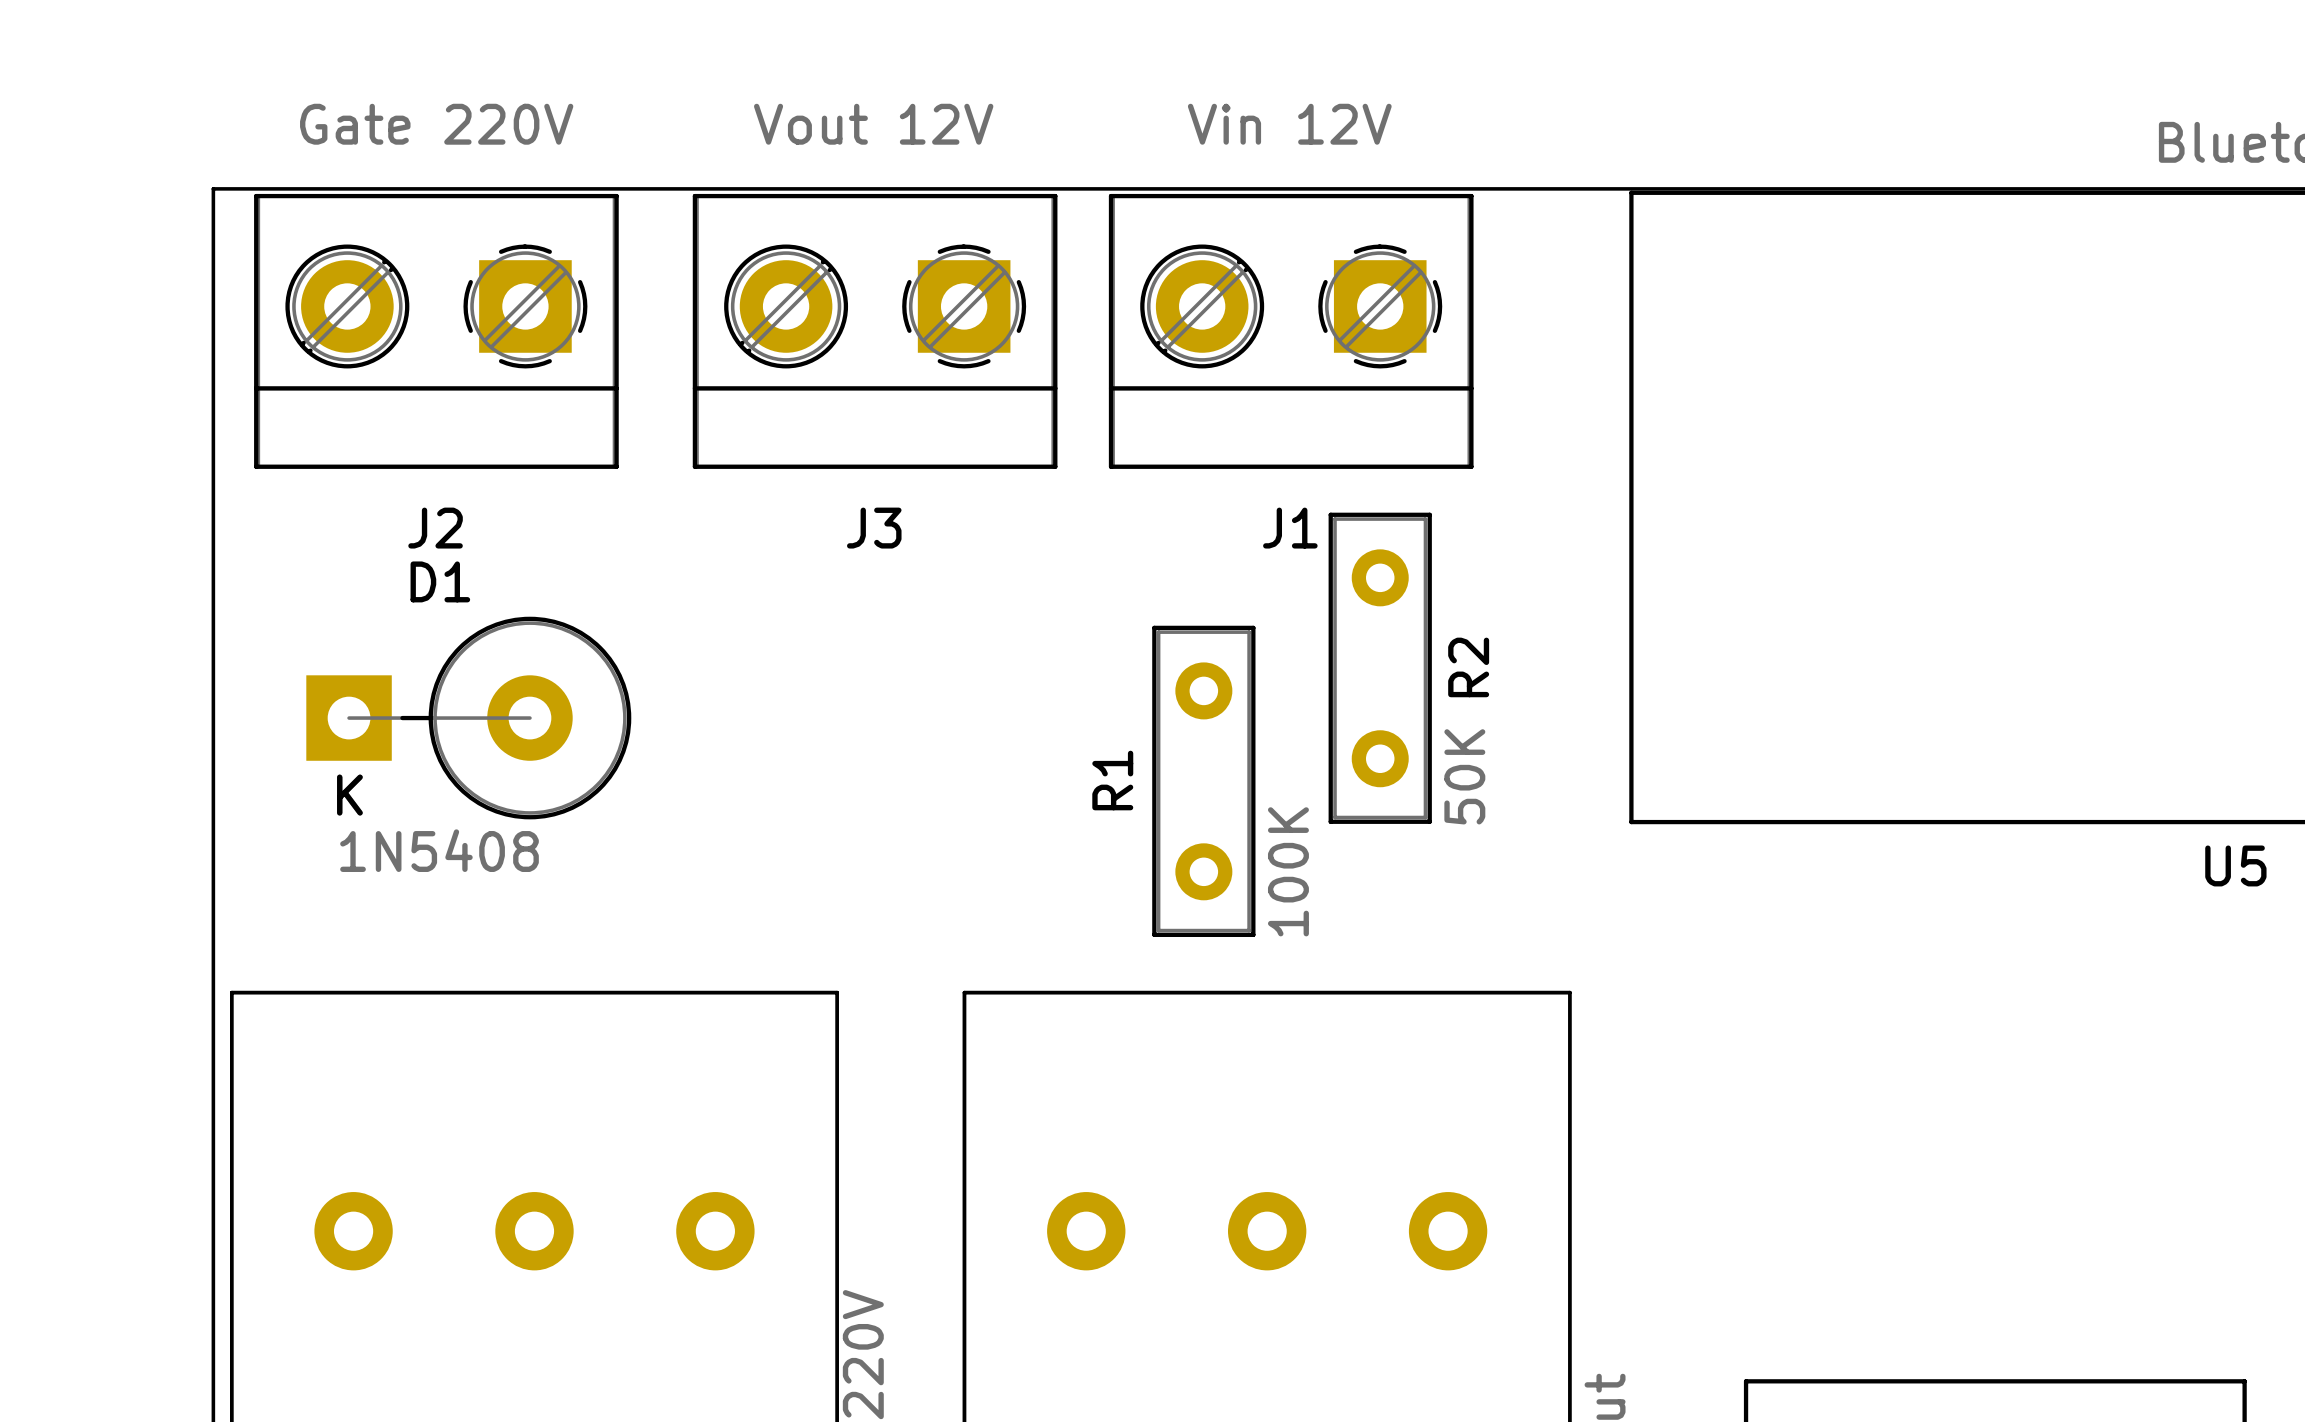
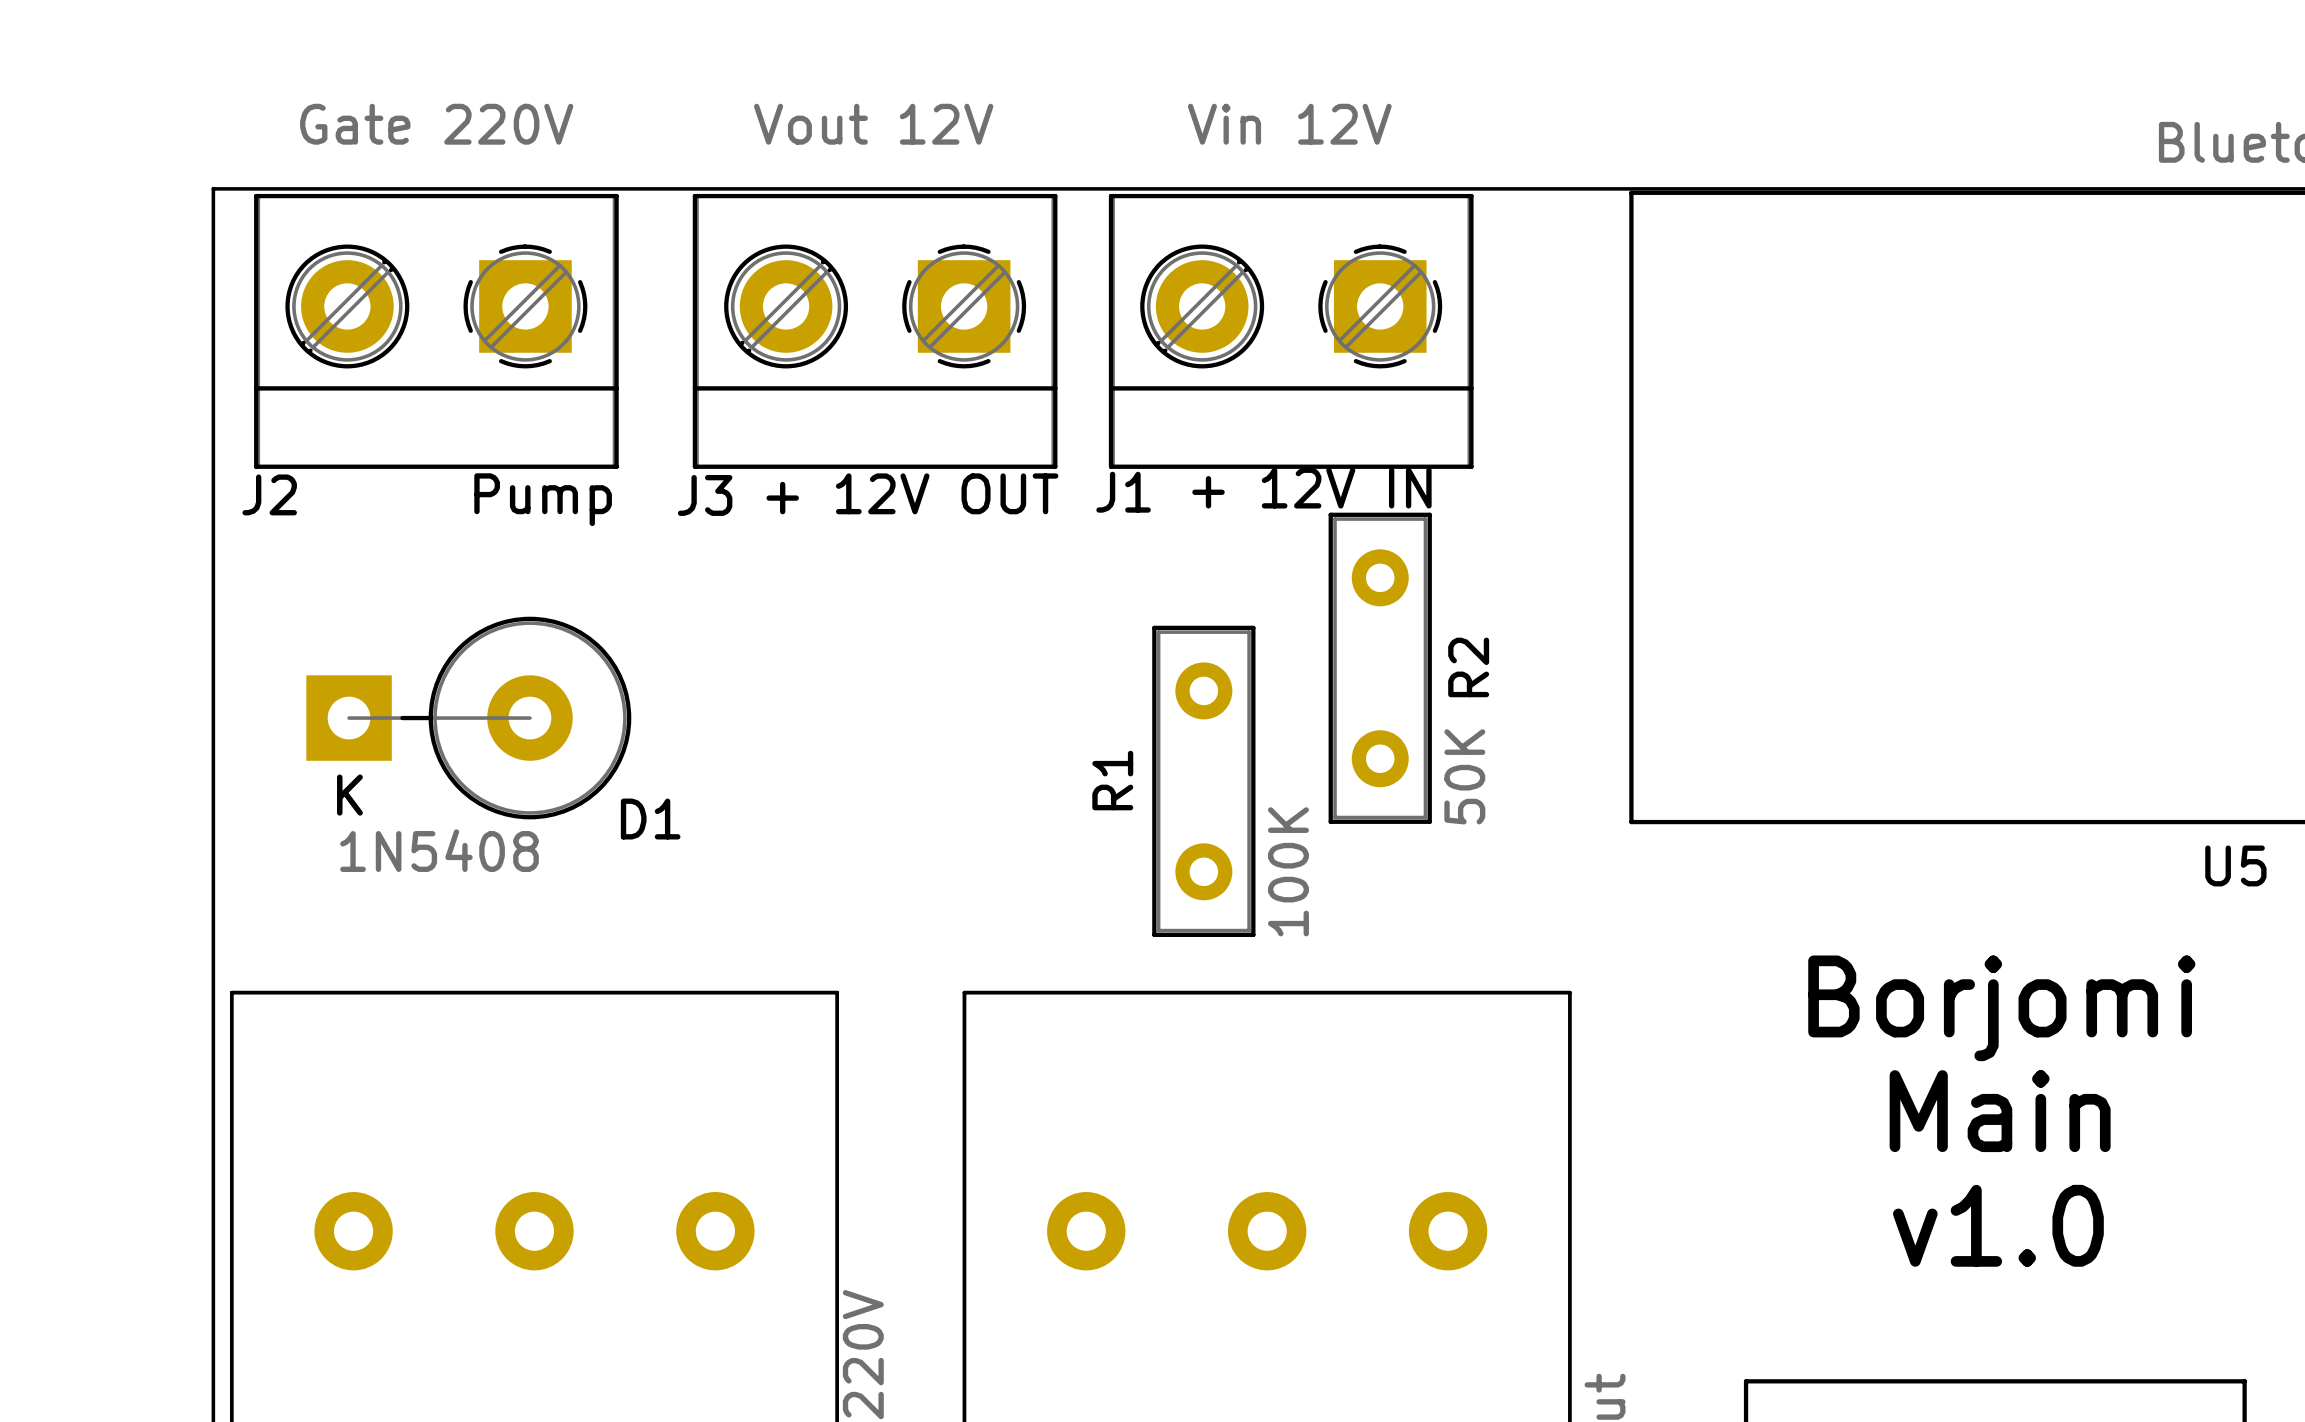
text: none -> + 12V IN (1311, 488)
text: none -> + 12V OUT (912, 493)
text: none -> Pump (543, 499)
J2 name position: J2 (435, 528) -> J2 (269, 494)
J3 name position: J3 (874, 528) -> J3 (705, 495)
J1 name position: J1 (1290, 528) -> J1 (1123, 492)
D1 name position: D1 (440, 581) -> D1 (650, 819)
text: none -> Borjomi (2001, 1008)
text: none -> Main (2000, 1111)
text: none -> v1.0 (1998, 1225)

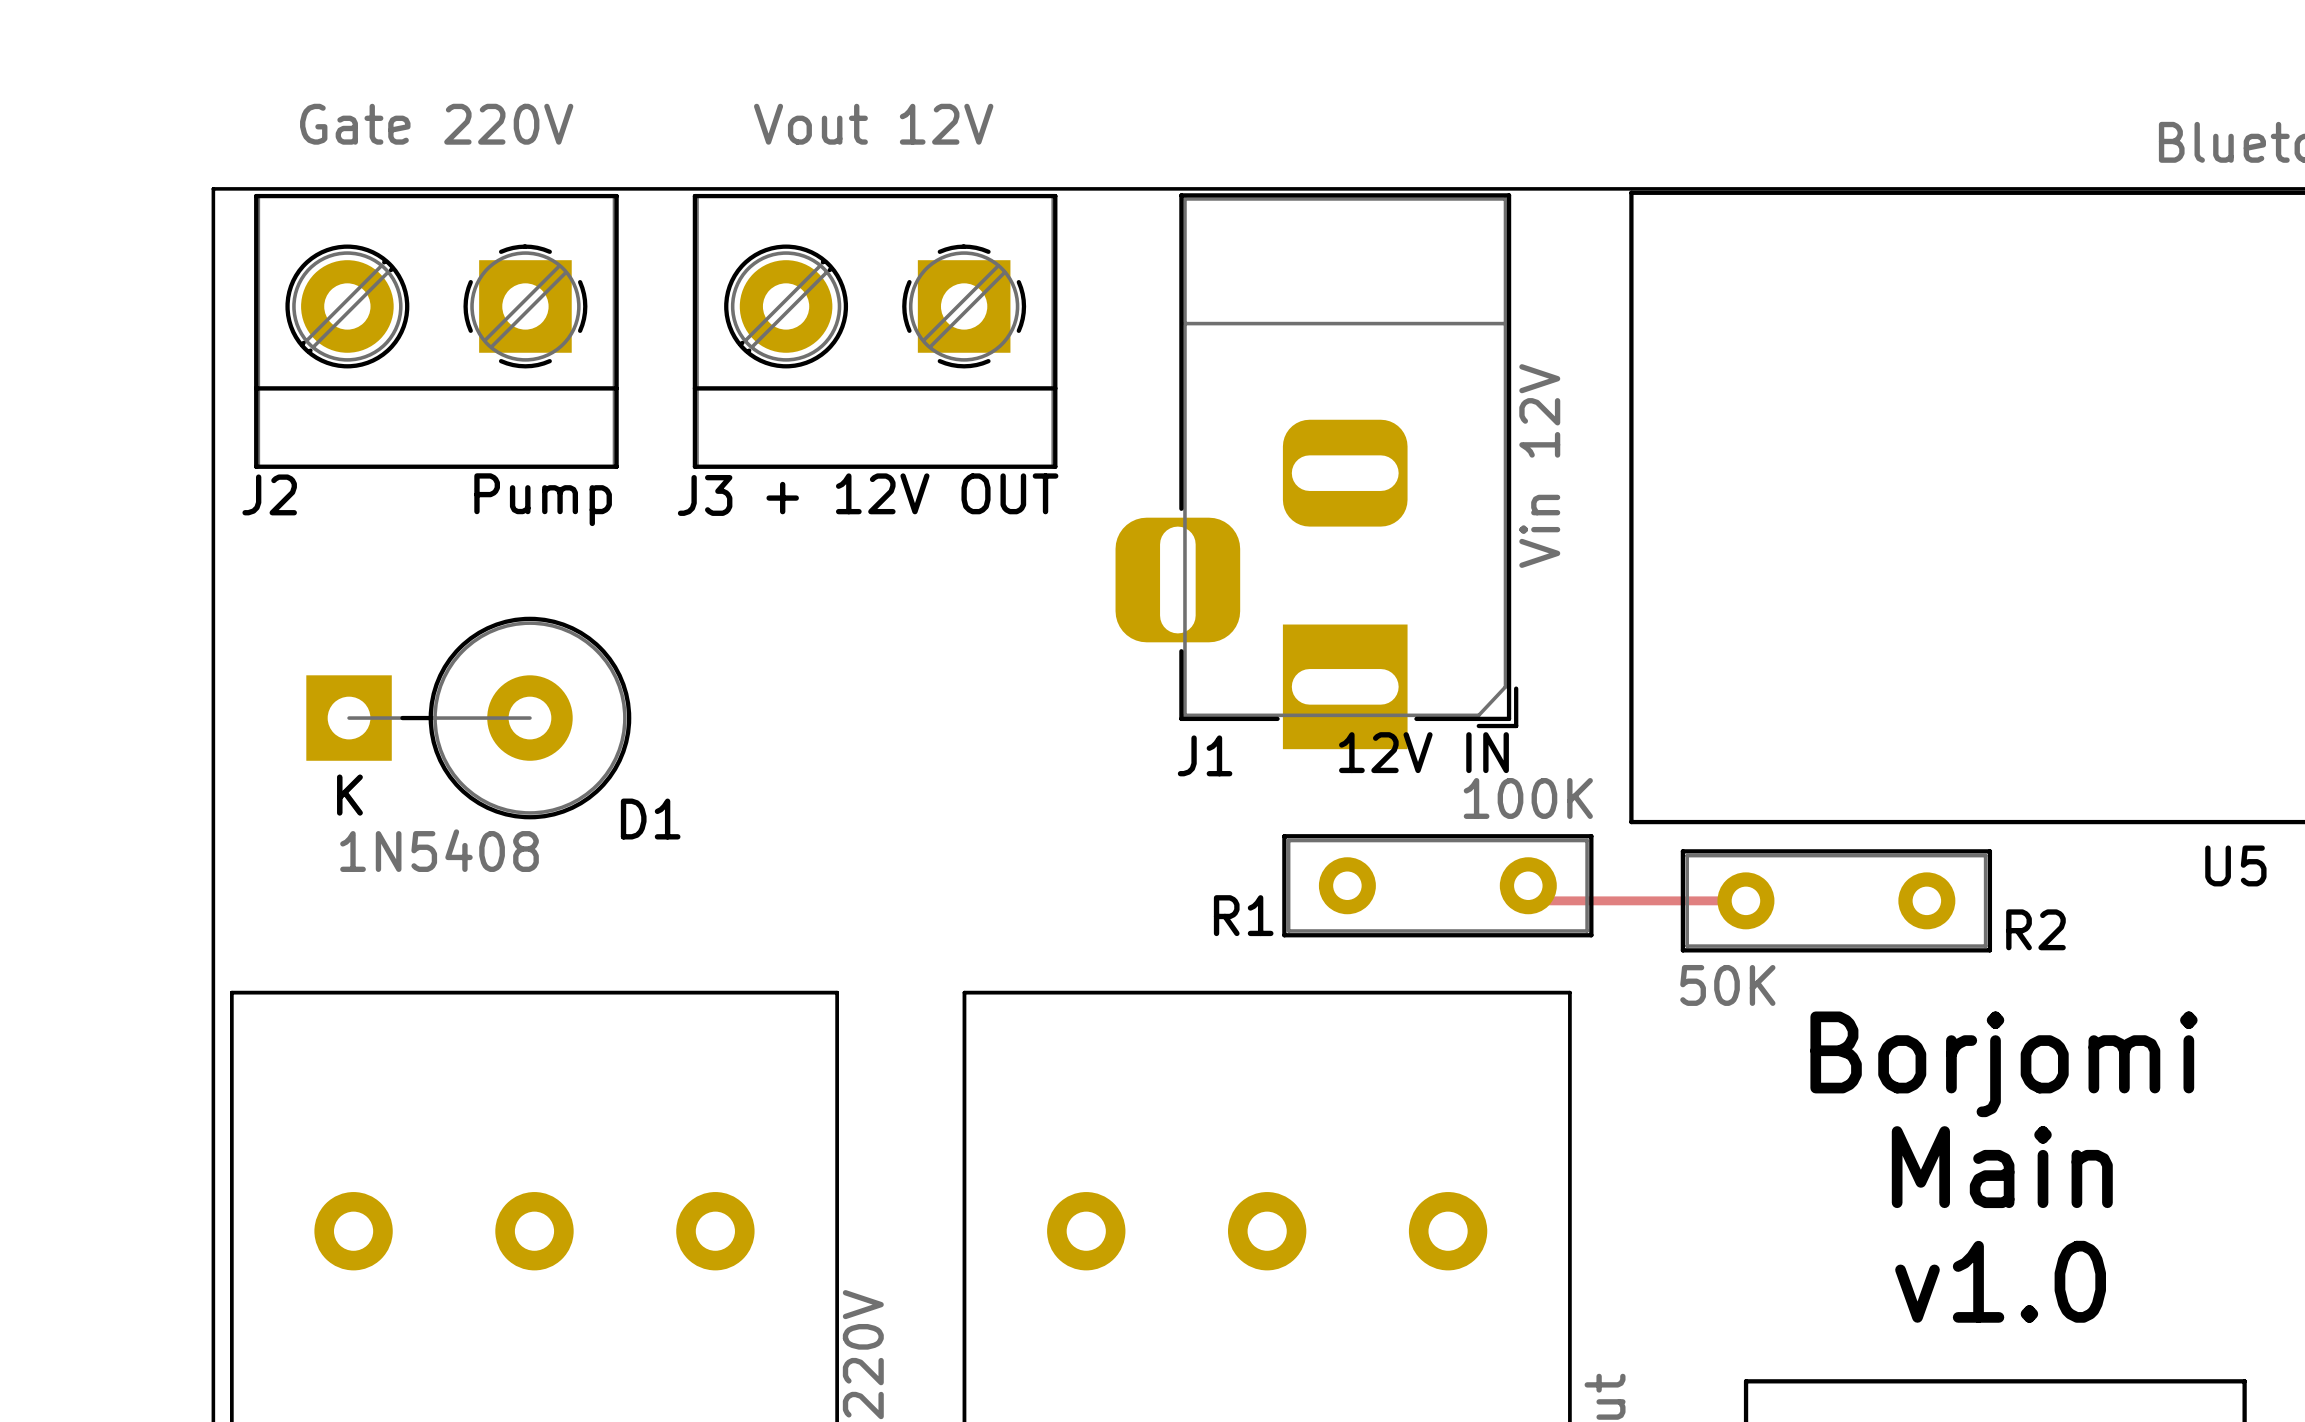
J1 value position: Vin 12V (1289, 124) -> Vin 12V (1539, 466)
J1 footprint: [1108, 193, 1474, 469] -> [1115, 193, 1519, 750]
text: + 12V IN (1311, 488) -> none
J1 name position: J1 (1123, 492) -> J1 (1205, 755)
R2 name position: R2 (1468, 667) -> R2 (2035, 929)
R2 rotation: 0° (1380, 668) -> 90° clockwise (1836, 900)
R2 position: (1380, 668) -> (1836, 900)
text: none -> 12V IN (1423, 752)
R1 name position: R1 (1112, 780) -> R1 (1243, 915)
R1 rotation: 0° (1203, 781) -> 90° clockwise (1437, 885)
R1 position: (1203, 781) -> (1437, 885)
R1 value position: 100K (1288, 871) -> 100K (1528, 798)
track: none -> (1528, 885) (1543, 900) (1745, 900)
text position: Borjomi (2001, 1008) -> Borjomi (2003, 1064)
text position: Main (2000, 1111) -> Main (2002, 1167)
text position: v1.0 (1998, 1225) -> v1.0 (2000, 1281)

